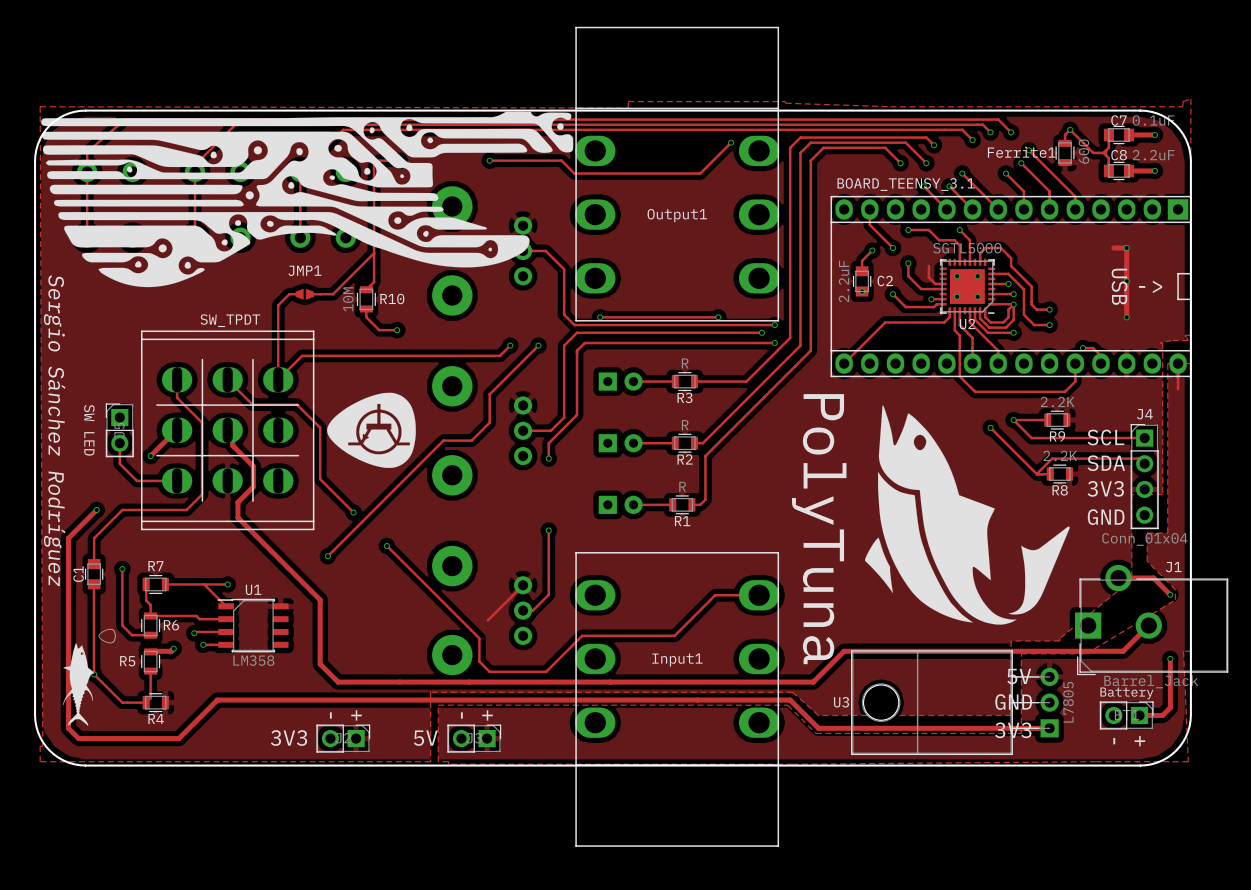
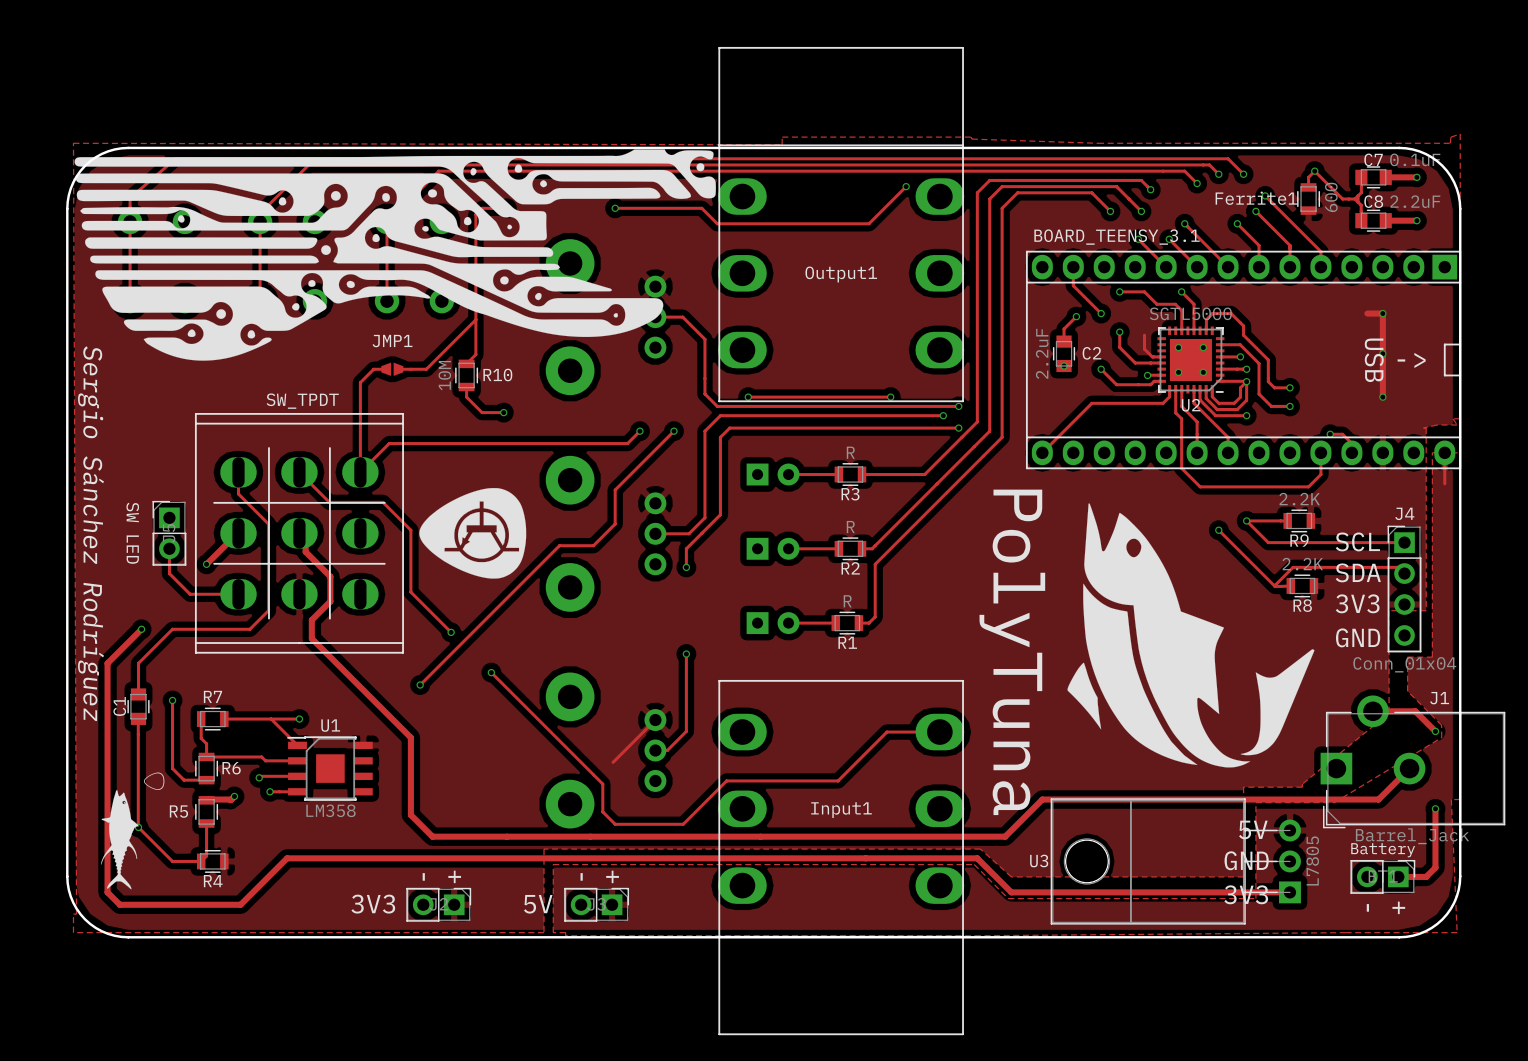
U1 footprint: [217, 598, 289, 653] -> [287, 736, 373, 801]

